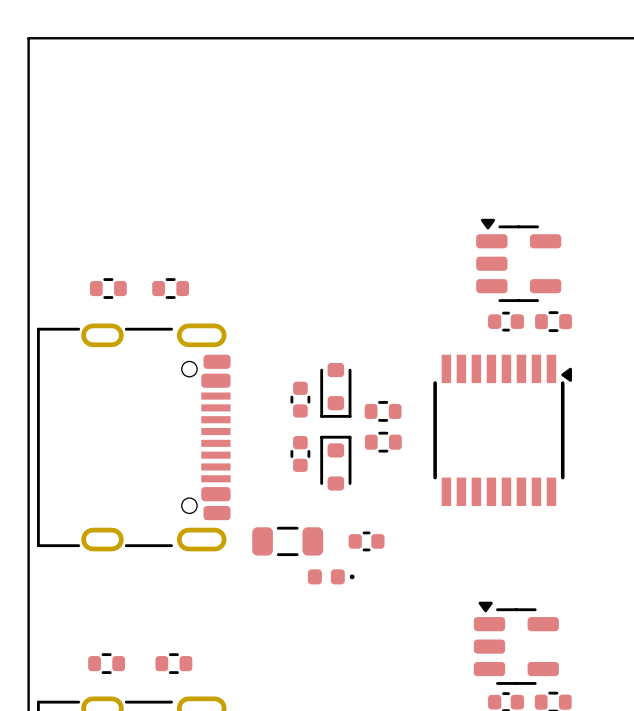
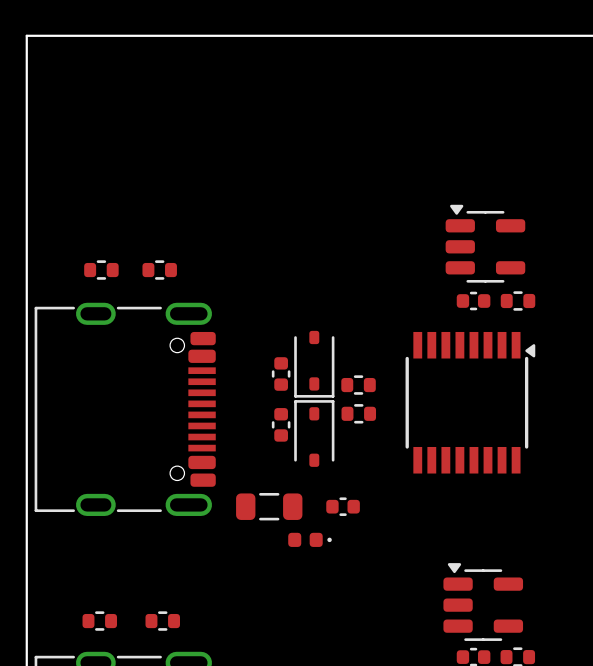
part footprint: [320, 362, 352, 418] -> [294, 330, 335, 398]
part footprint: [320, 435, 352, 491] -> [294, 400, 335, 467]

